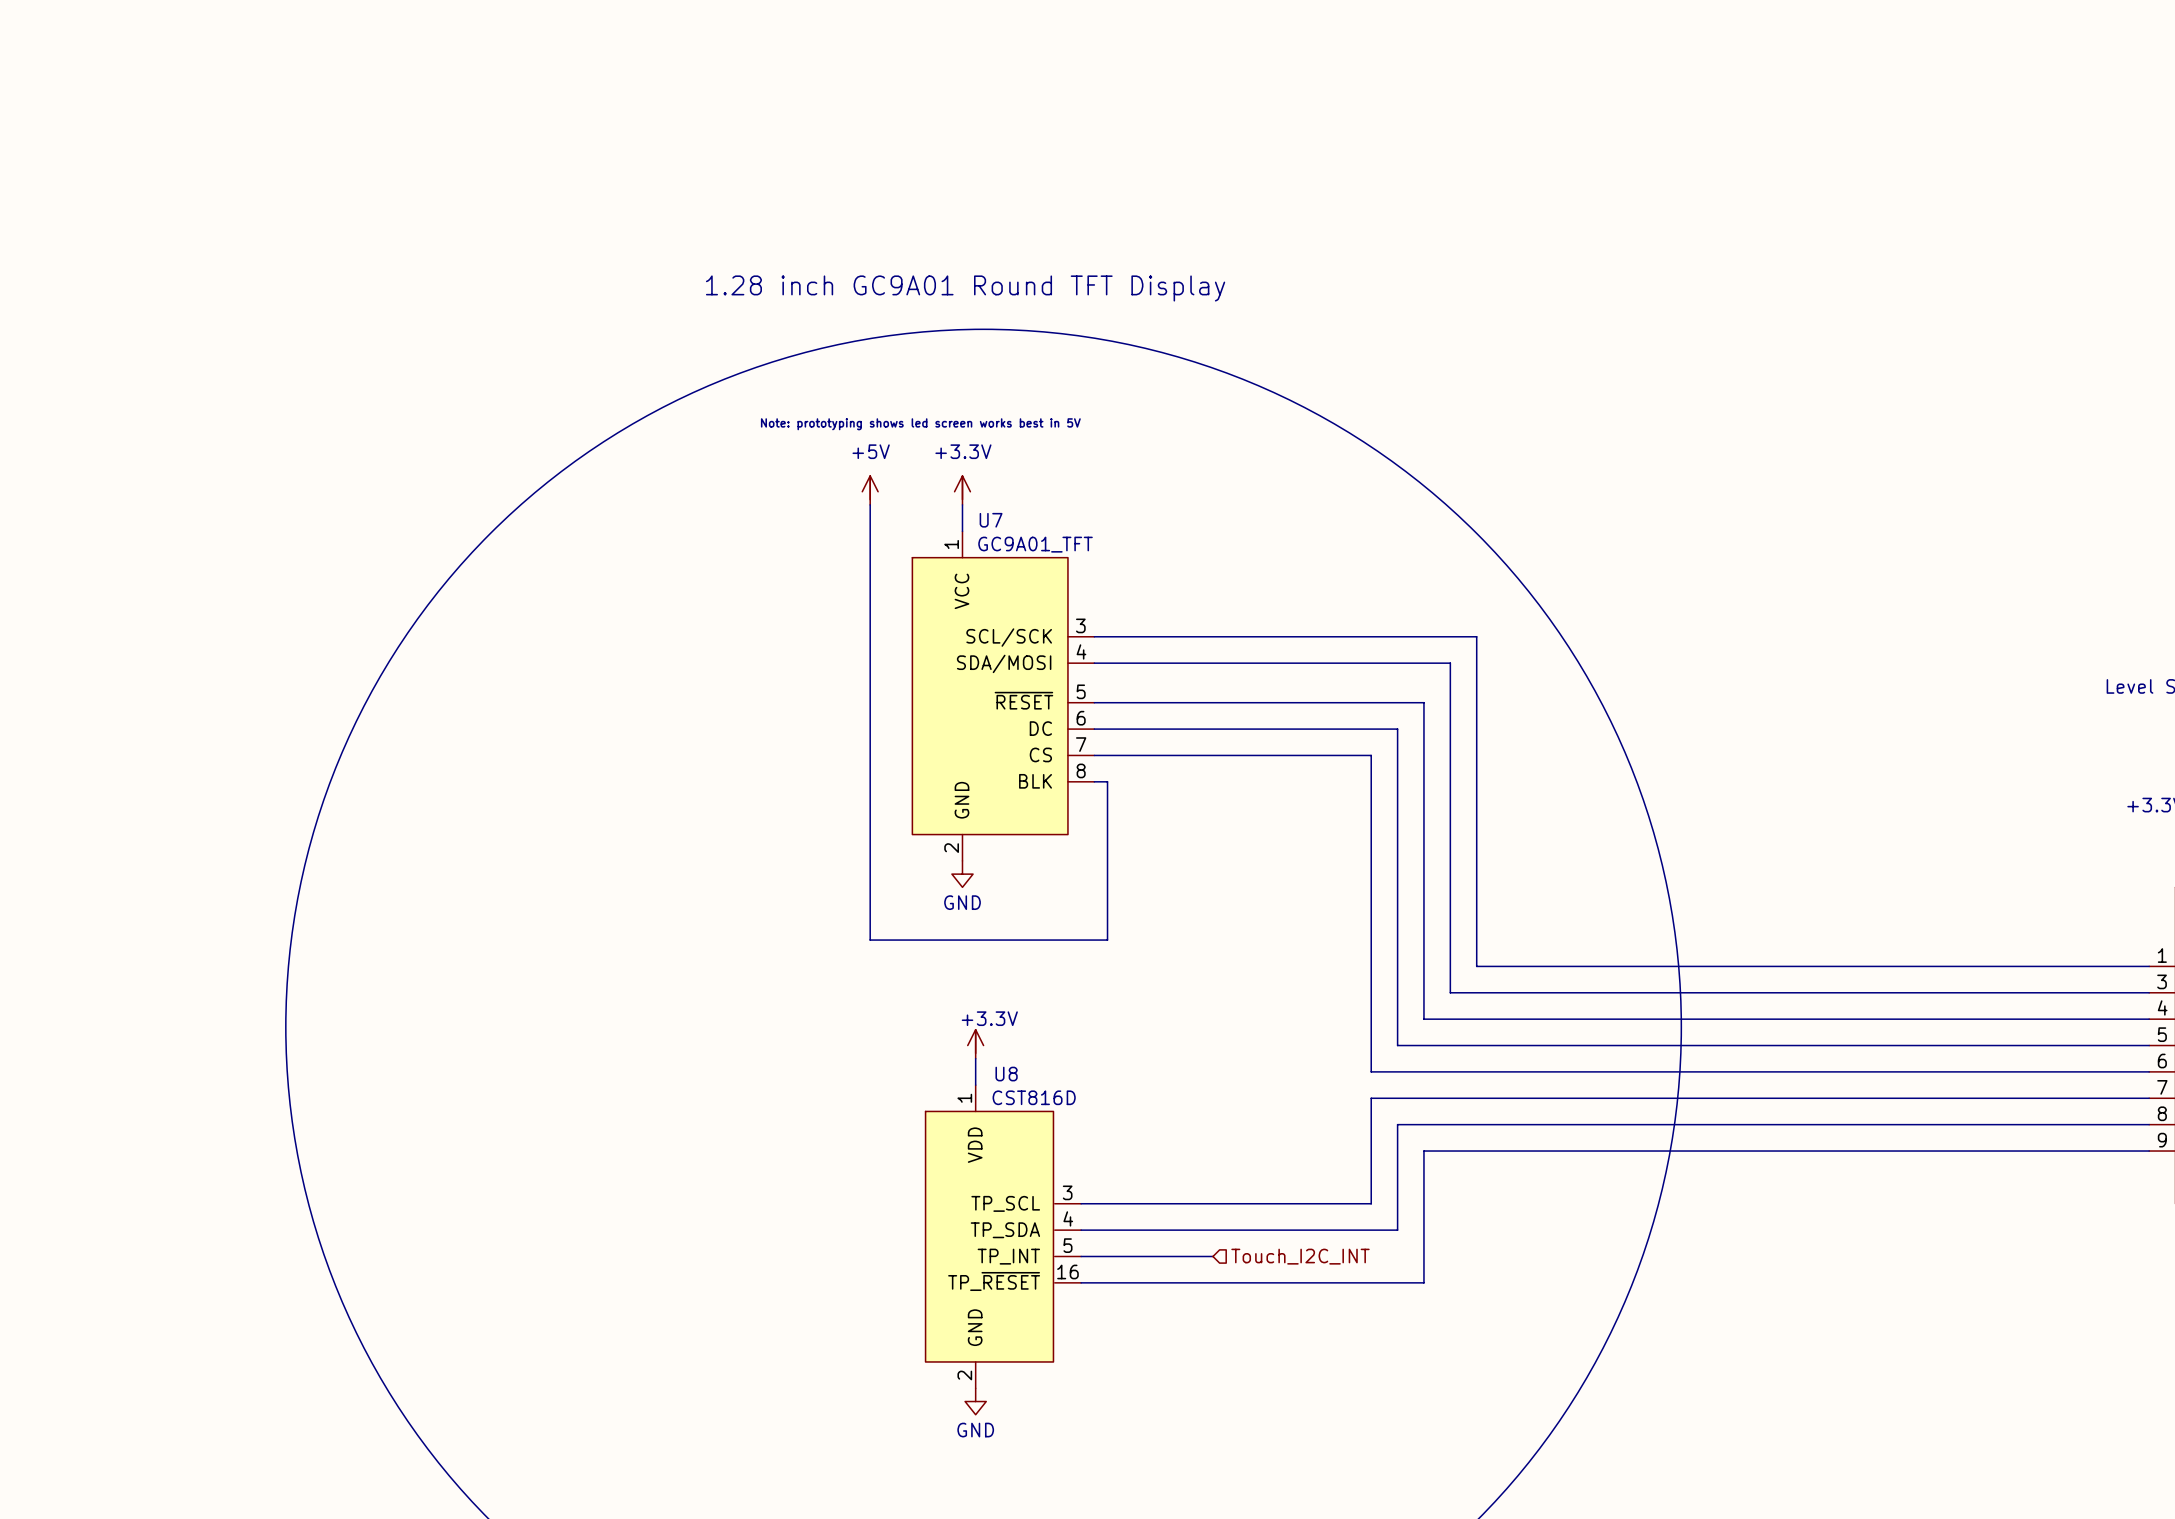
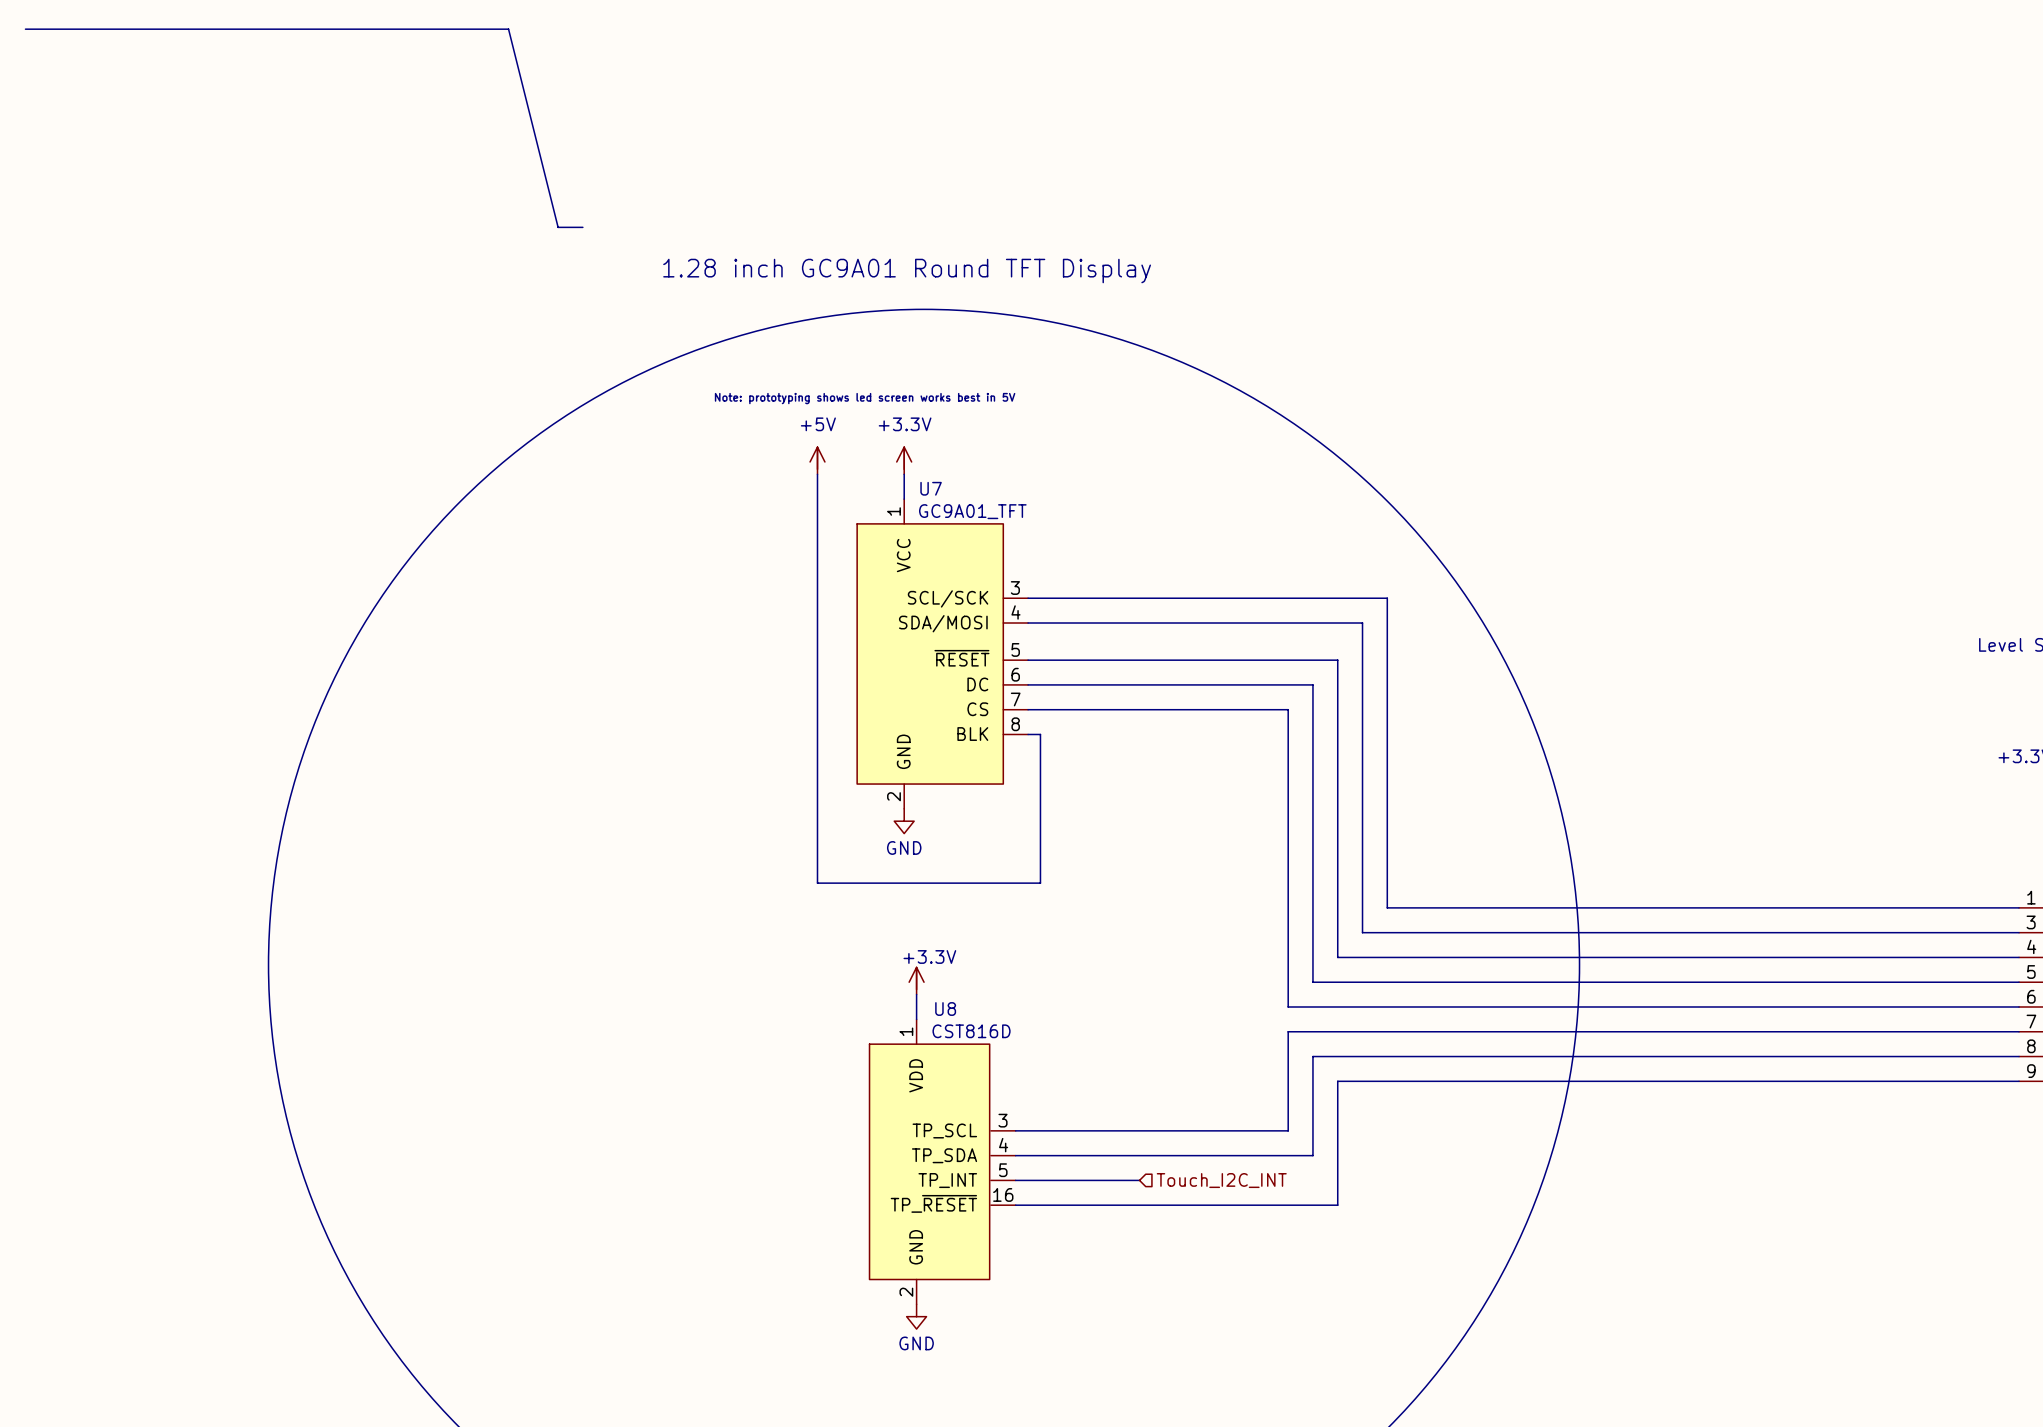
wire: none -> (25, 29) (508, 29) (558, 227) (582, 227)

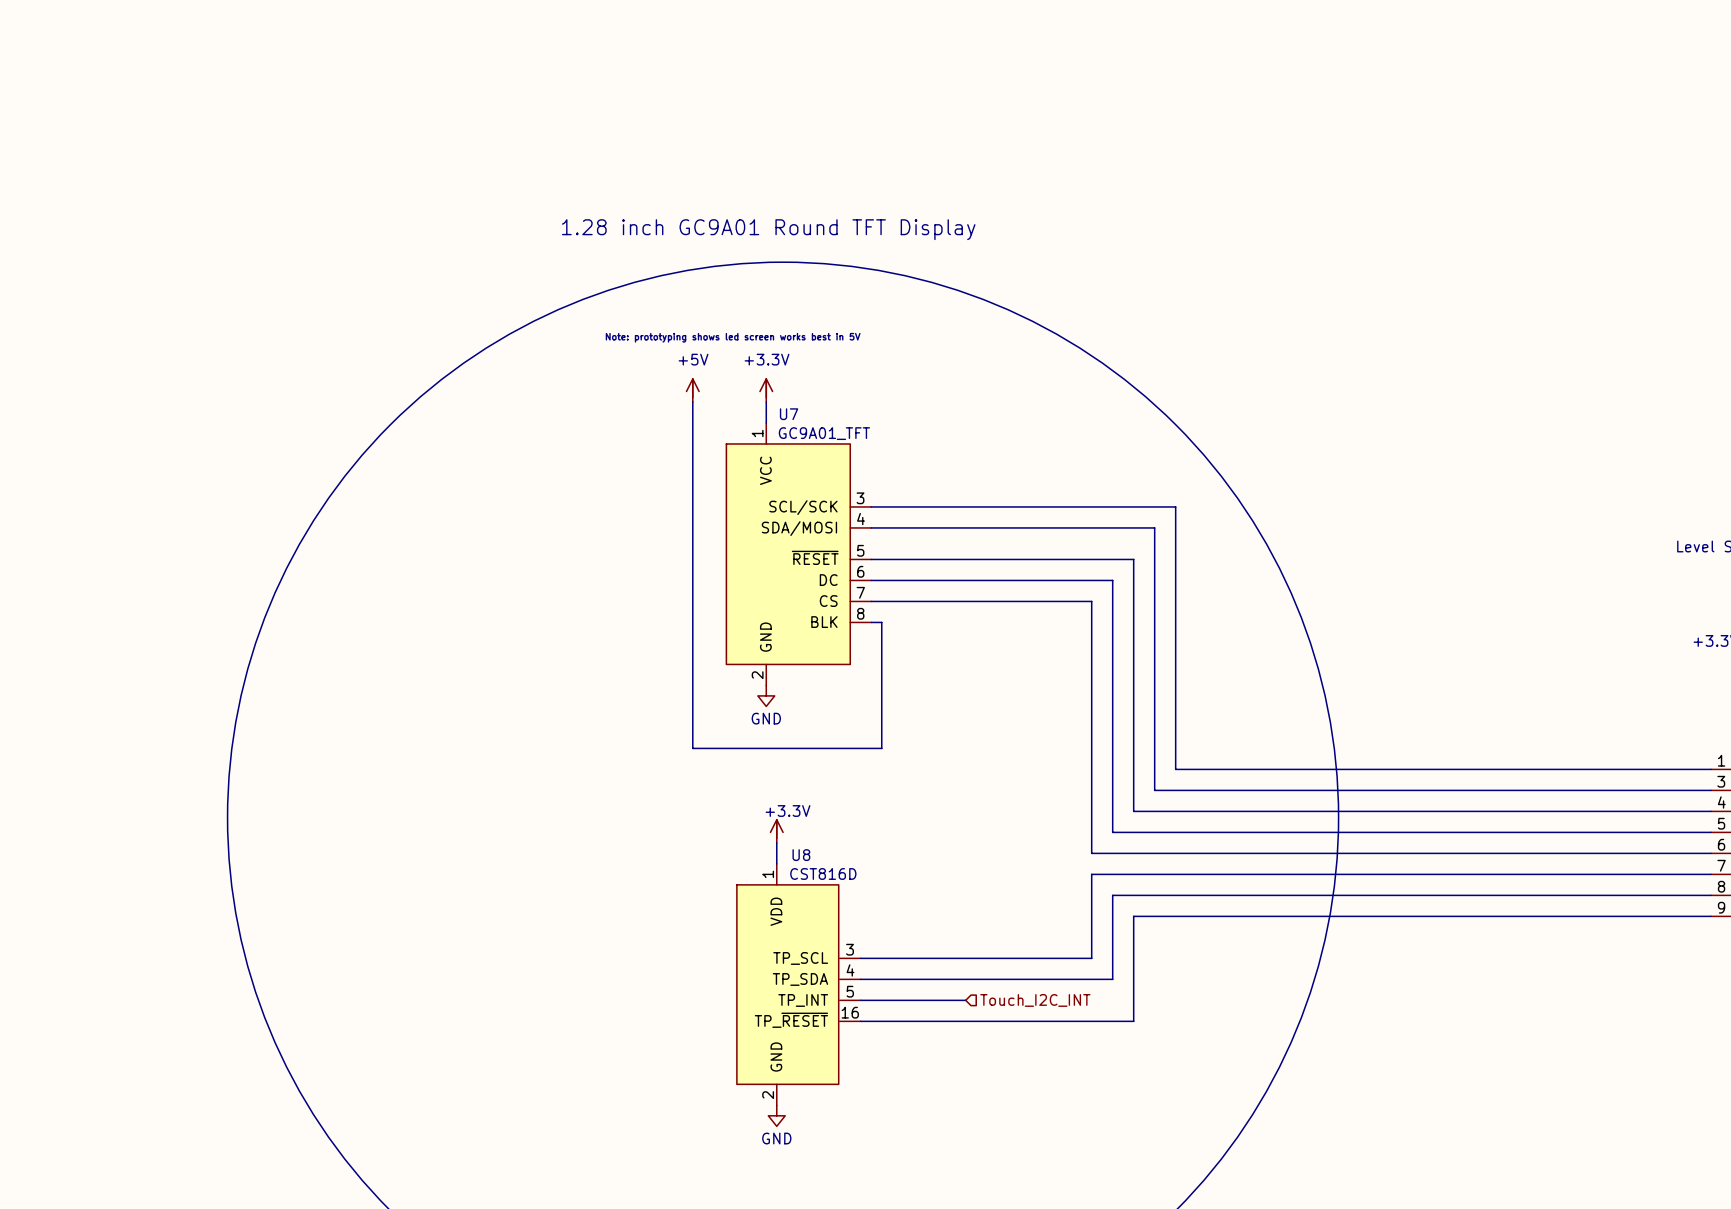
wire: (25, 29) (508, 29) (558, 227) (582, 227) -> none

